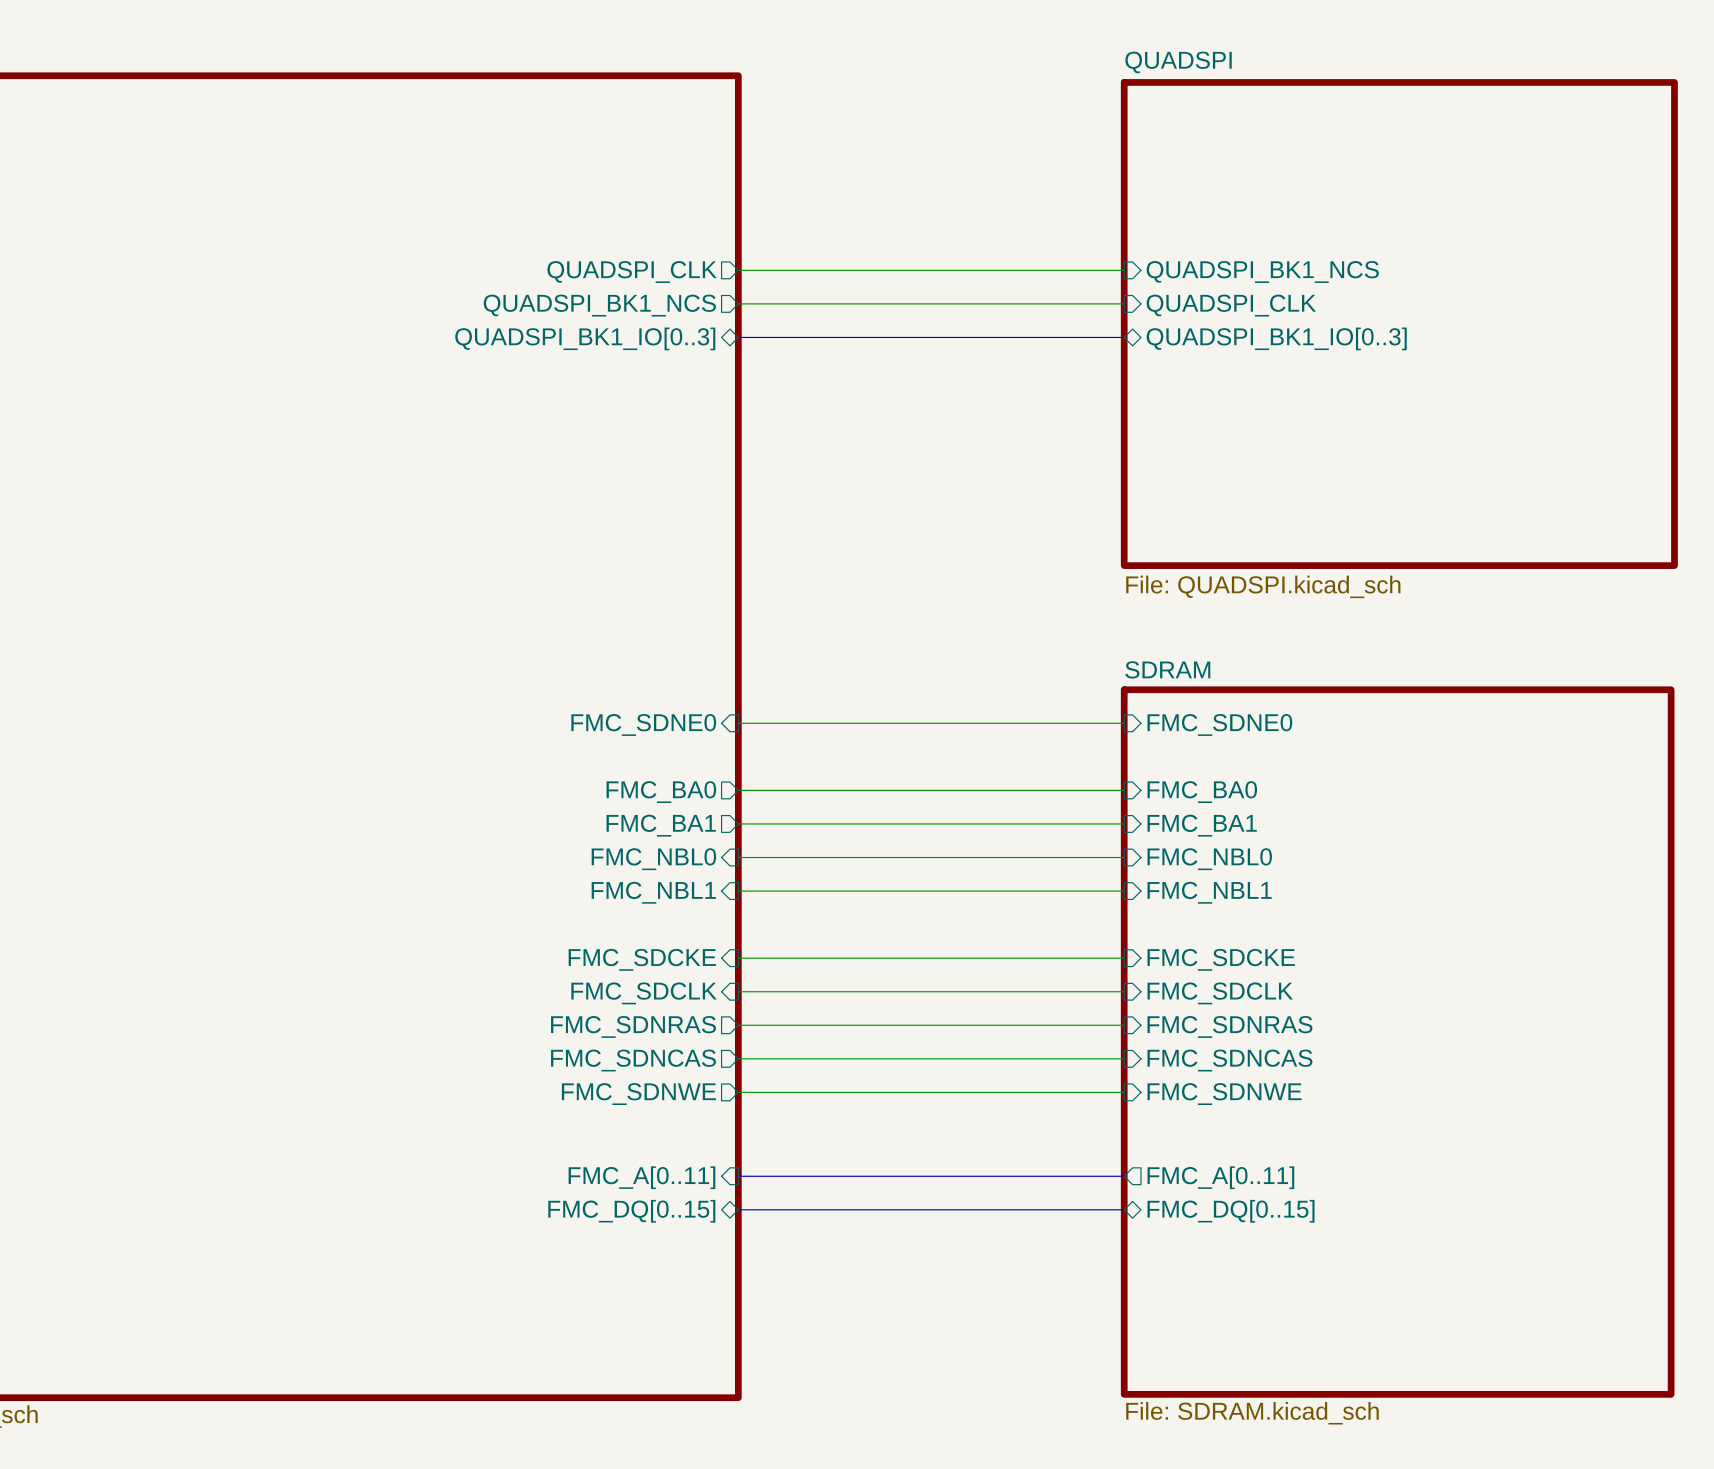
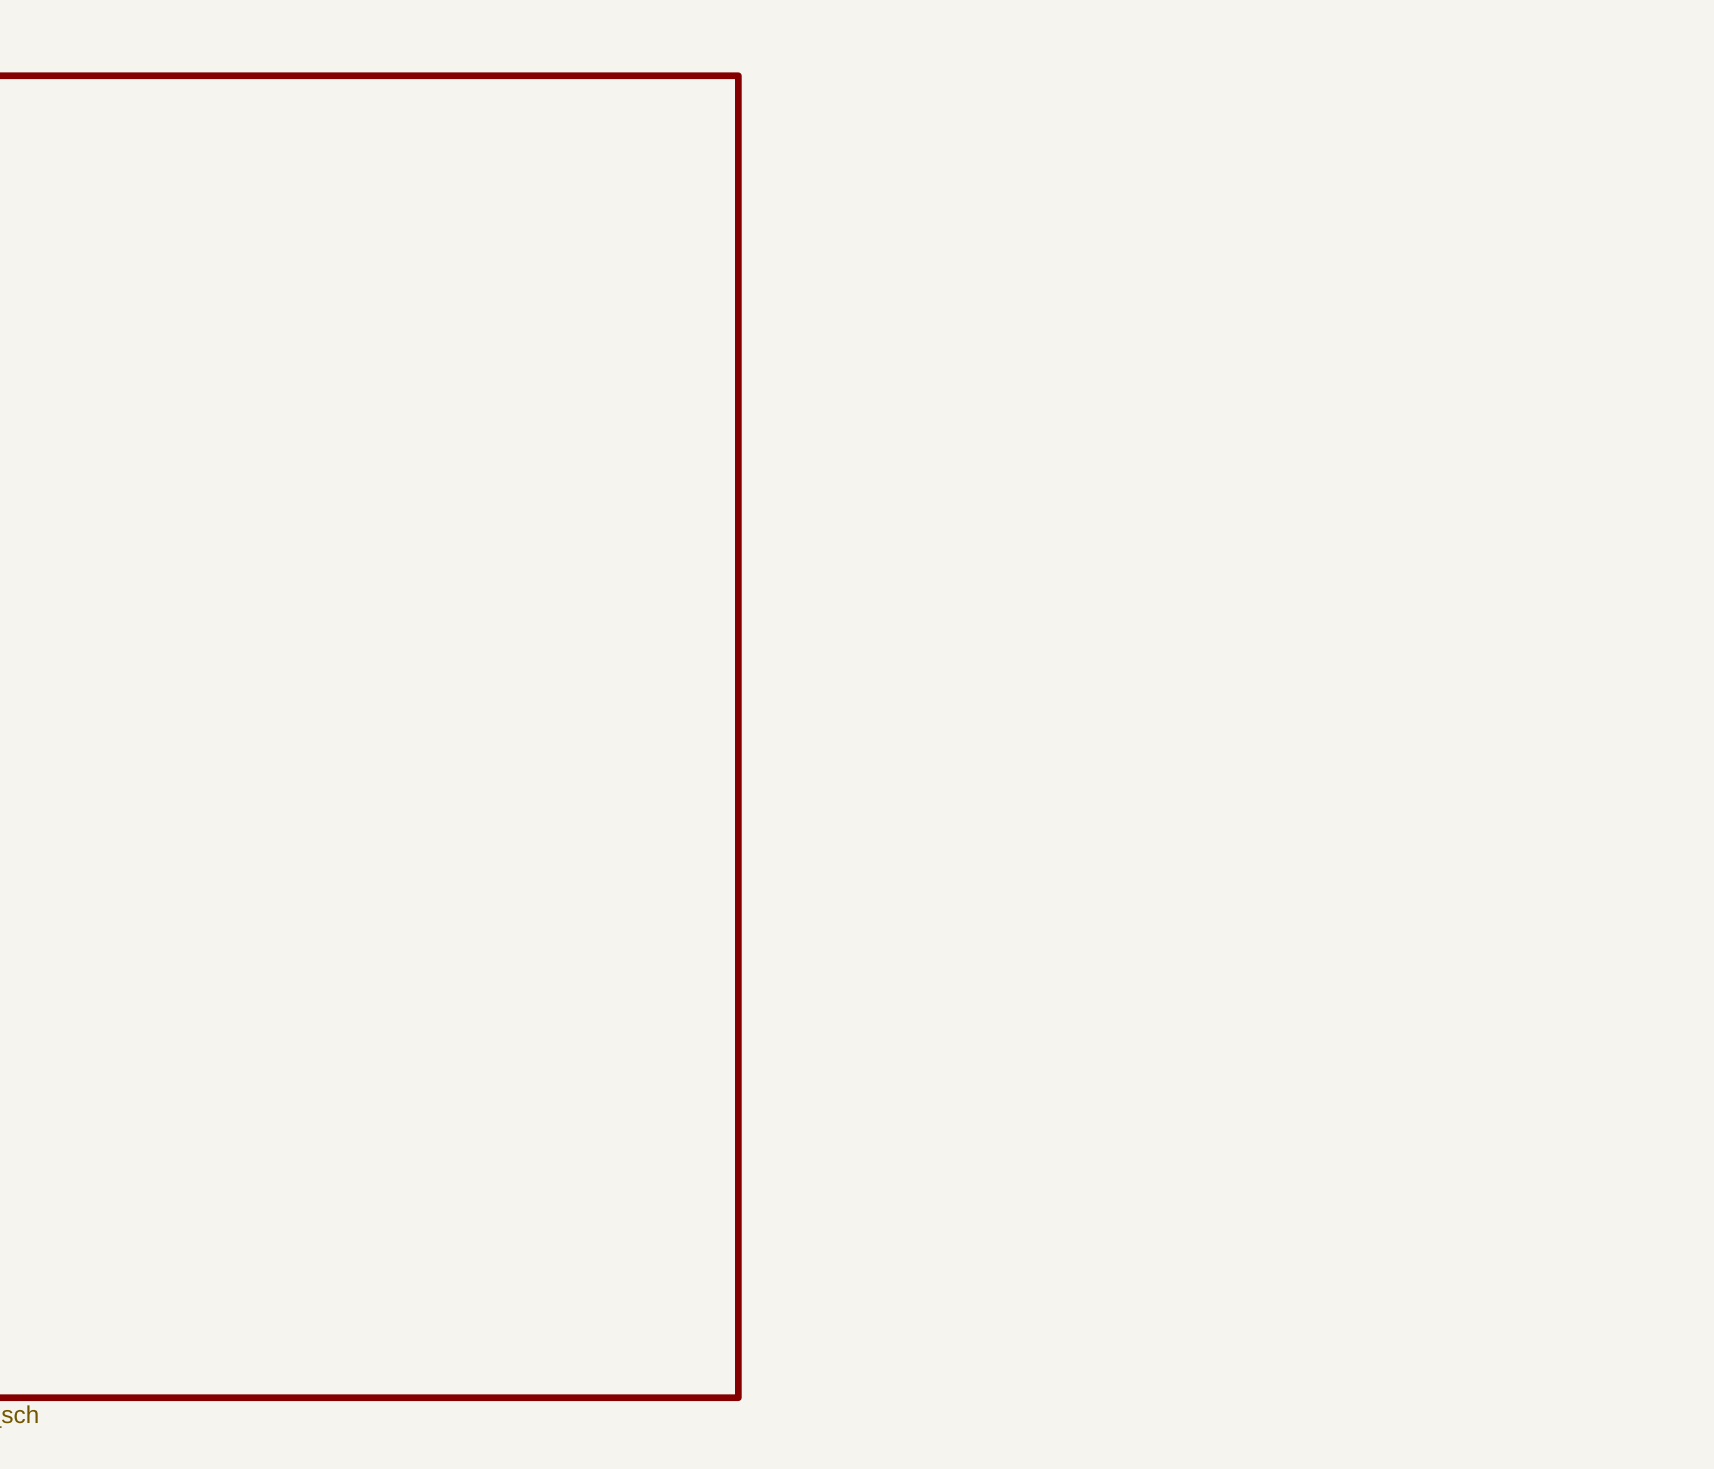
wire: (738, 270) (1124, 270) -> none
sheet pin: QUADSPI_CLK (632, 272) -> none
sheet pin: QUADSPI_BK1_NCS (1262, 272) -> none
wire: (738, 303) (1124, 303) -> none
sheet pin: QUADSPI_BK1_NCS (599, 305) -> none
sheet pin: QUADSPI_CLK (1231, 305) -> none
sheet QUADSPI: File: QUADSPI.kicad_sch (1399, 324) -> none
bus: (738, 337) (1124, 337) -> none
sheet pin: QUADSPI_BK1_IO[0..3] (585, 338) -> none
sheet pin: QUADSPI_BK1_IO[0..3] (1276, 338) -> none
wire: (738, 723) (1124, 723) -> none
sheet pin: FMC_SDNE0 (643, 724) -> none
sheet pin: FMC_SDNE0 (1219, 724) -> none
wire: (738, 790) (1124, 790) -> none
sheet pin: FMC_BA0 (661, 792) -> none
sheet pin: FMC_BA0 (1202, 792) -> none
wire: (738, 823) (1124, 823) -> none
sheet pin: FMC_BA1 (661, 825) -> none
sheet pin: FMC_BA1 (1202, 825) -> none
wire: (738, 857) (1124, 857) -> none
sheet pin: FMC_NBL0 (653, 859) -> none
sheet pin: FMC_NBL0 (1209, 859) -> none
wire: (738, 891) (1124, 891) -> none
sheet pin: FMC_NBL1 (653, 892) -> none
sheet pin: FMC_NBL1 (1209, 892) -> none
wire: (738, 958) (1124, 958) -> none
sheet pin: FMC_SDCKE (642, 959) -> none
sheet pin: FMC_SDCKE (1221, 959) -> none
wire: (738, 991) (1124, 991) -> none
sheet pin: FMC_SDCLK (644, 993) -> none
sheet pin: FMC_SDCLK (1220, 993) -> none
wire: (738, 1025) (1124, 1025) -> none
sheet pin: FMC_SDNRAS (633, 1026) -> none
sheet pin: FMC_SDNRAS (1229, 1026) -> none
sheet SDRAM: File: SDRAM.kicad_sch (1397, 1042) -> none
wire: (738, 1058) (1124, 1058) -> none
sheet pin: FMC_SDNCAS (633, 1060) -> none
sheet pin: FMC_SDNCAS (1229, 1060) -> none
wire: (738, 1092) (1124, 1092) -> none
sheet pin: FMC_SDNWE (638, 1094) -> none
sheet pin: FMC_SDNWE (1224, 1094) -> none
bus: (738, 1176) (1124, 1176) -> none
sheet pin: FMC_A[0..11] (641, 1177) -> none
sheet pin: FMC_A[0..11] (1220, 1177) -> none
bus: (738, 1209) (1124, 1209) -> none
sheet pin: FMC_DQ[0..15] (631, 1211) -> none
sheet pin: FMC_DQ[0..15] (1231, 1211) -> none

